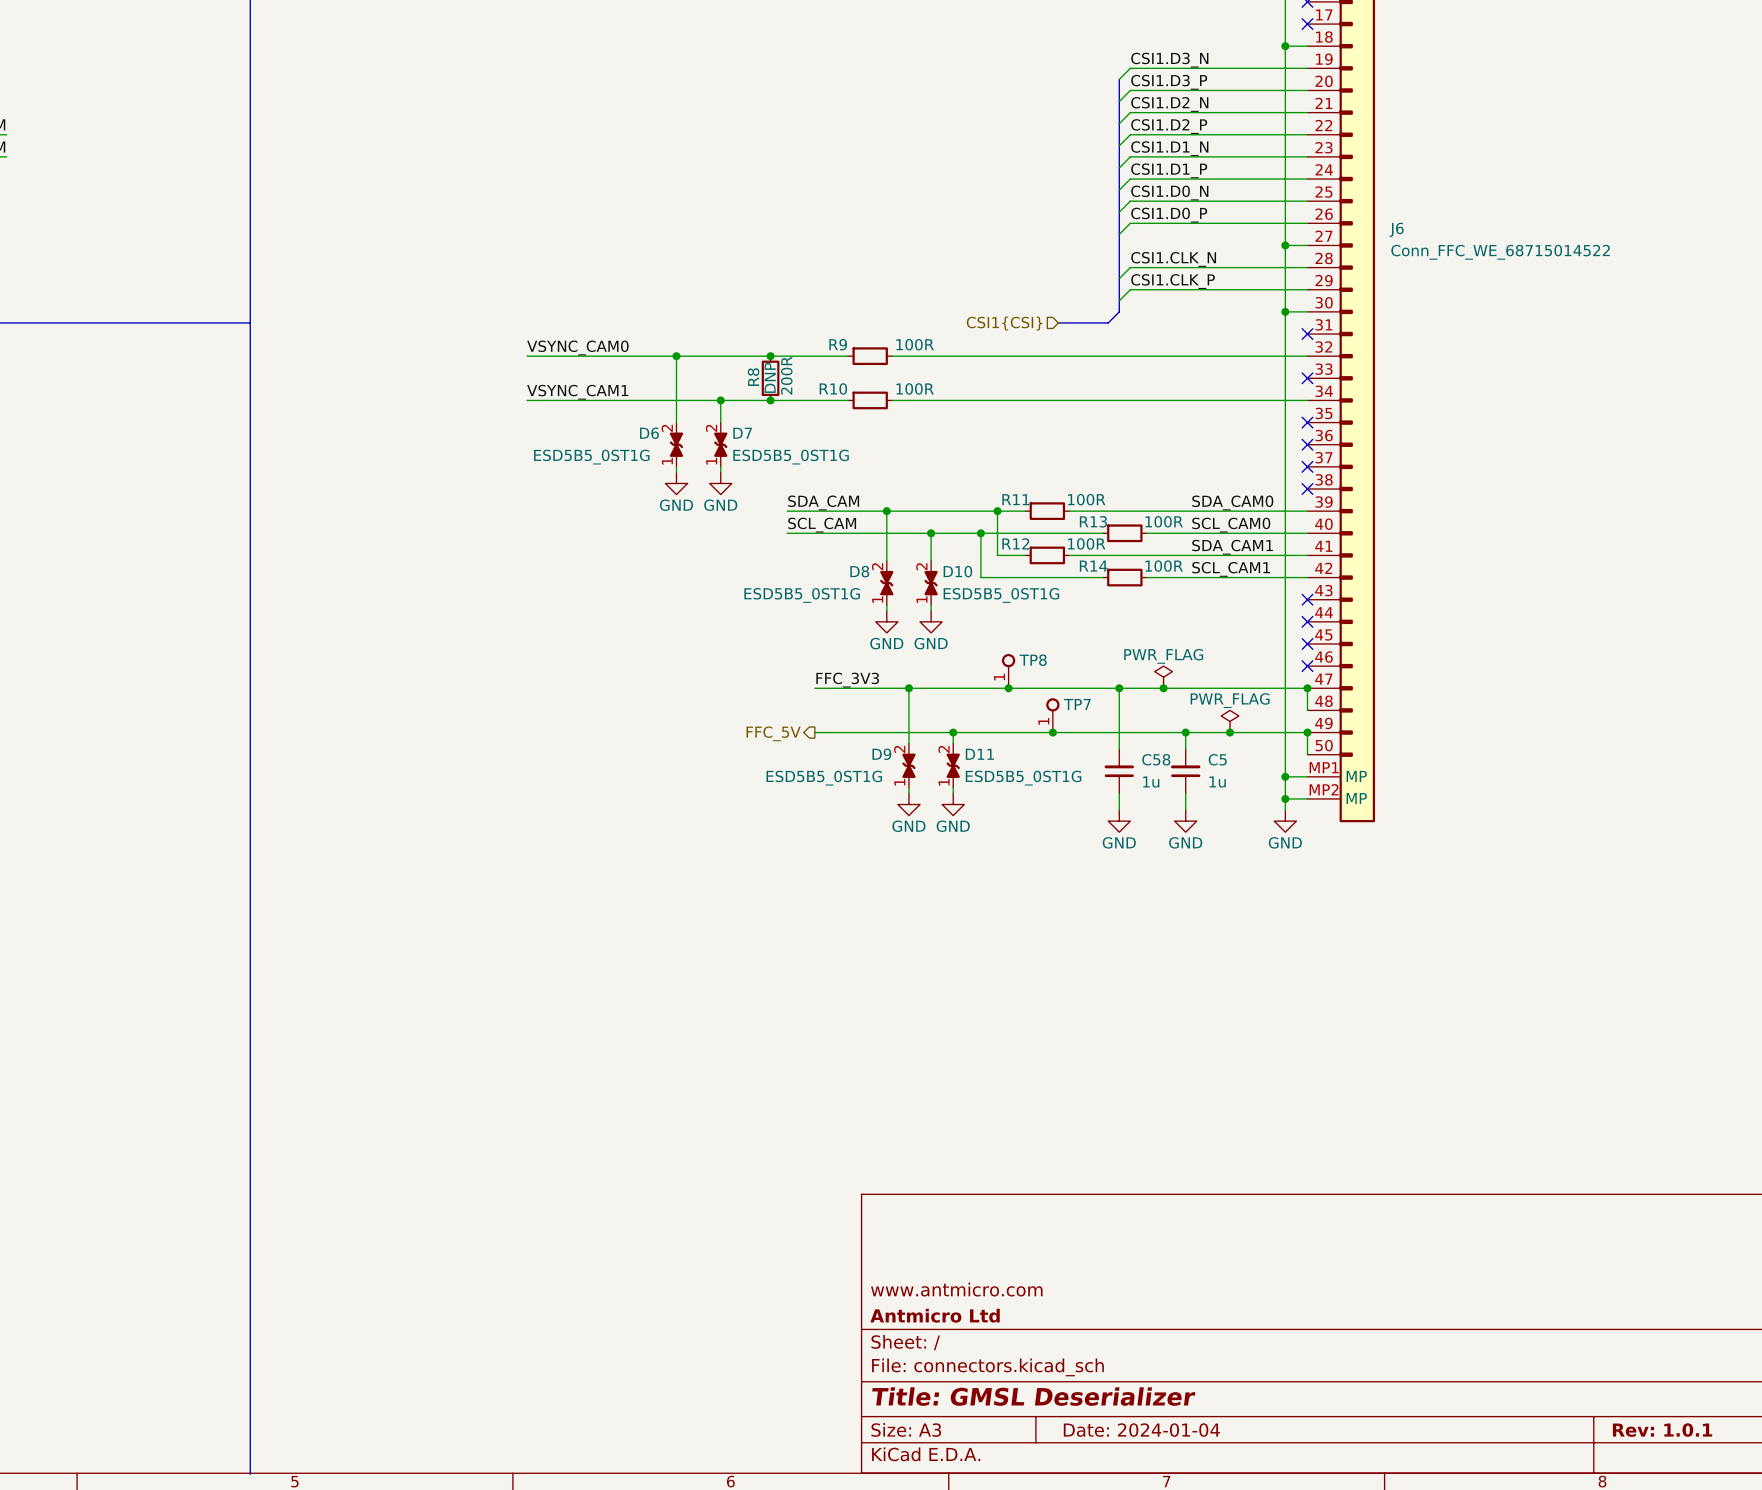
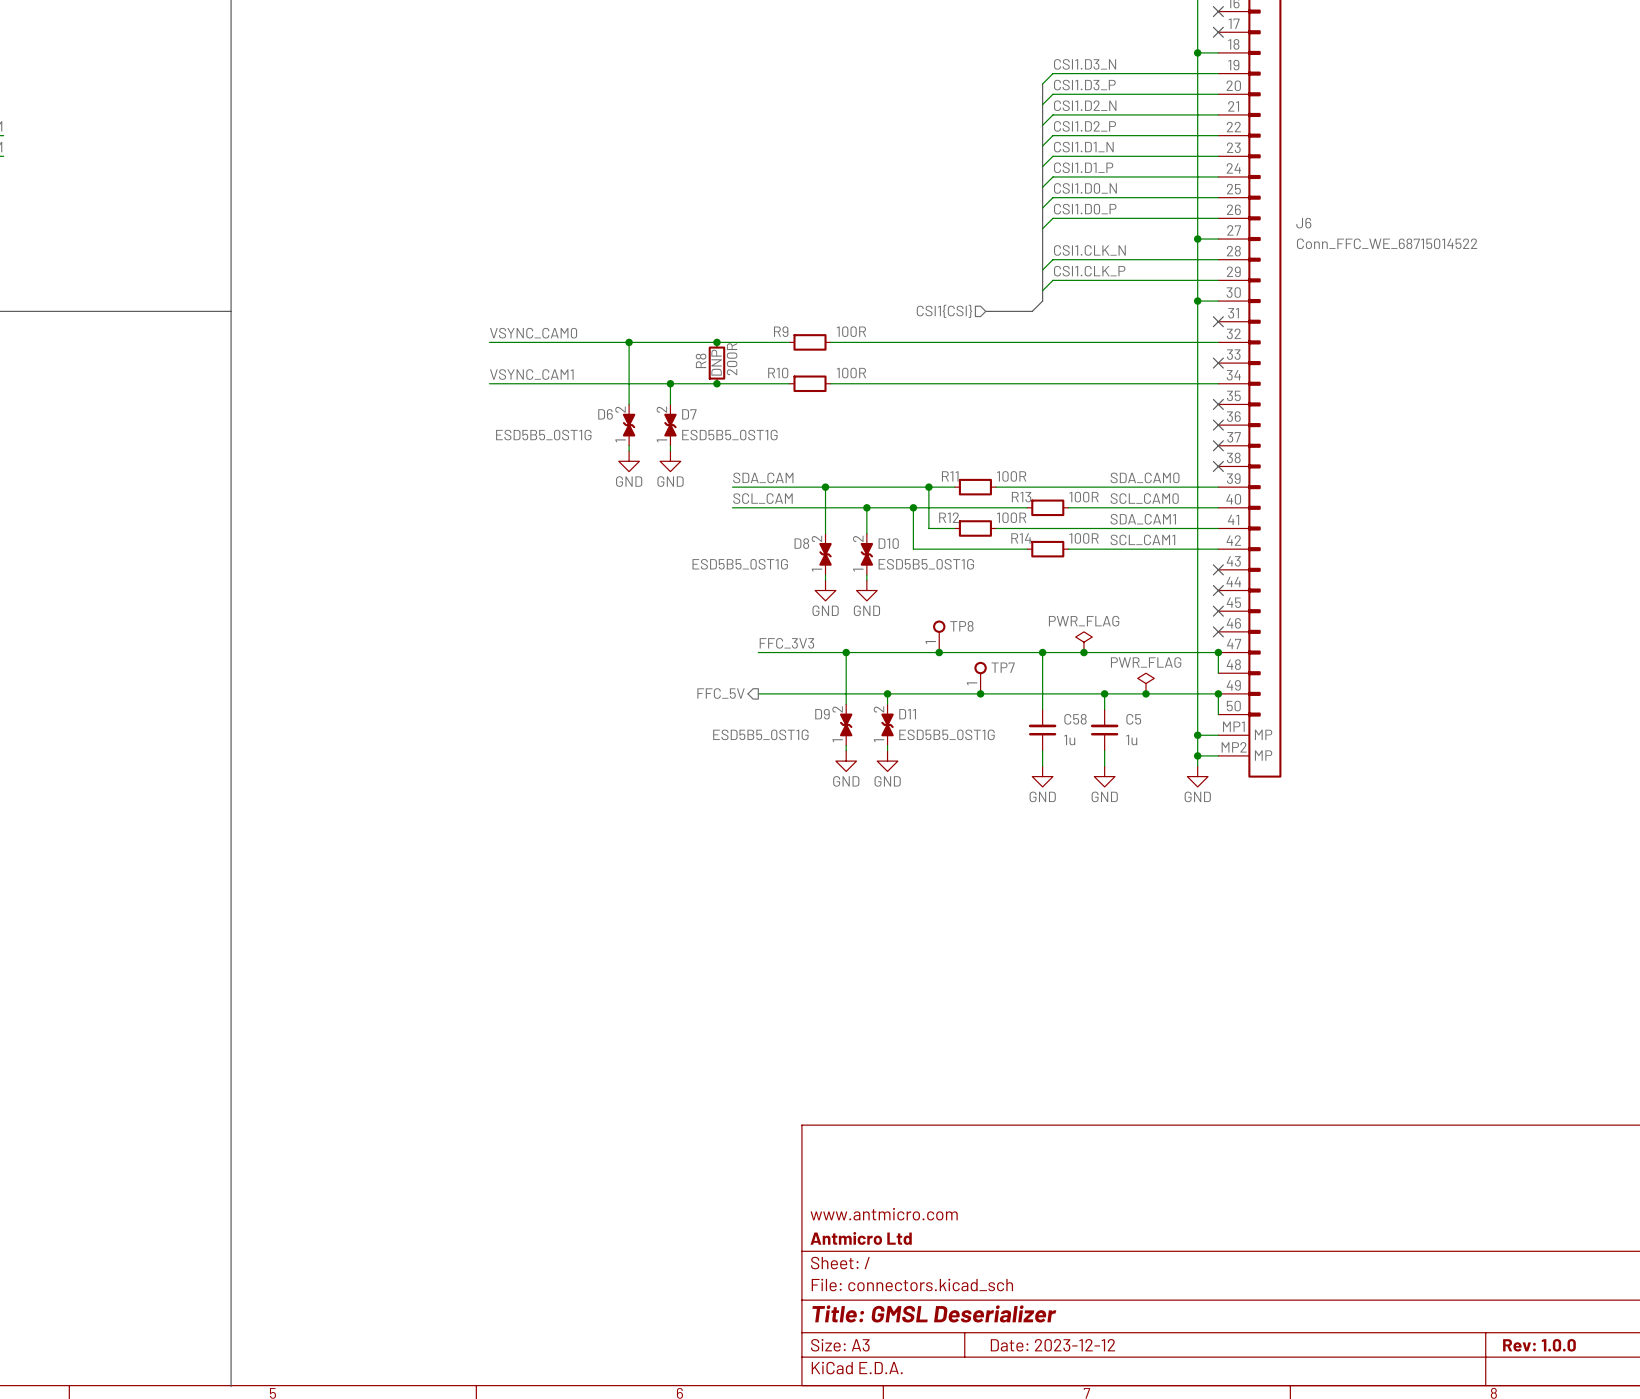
title block: Date: 2024-01-04 (1141, 1430) -> Date: 2023-12-12 (1052, 1345)
title block: Rev: 1.0.1 (1662, 1430) -> Rev: 1.0.0 (1539, 1345)

